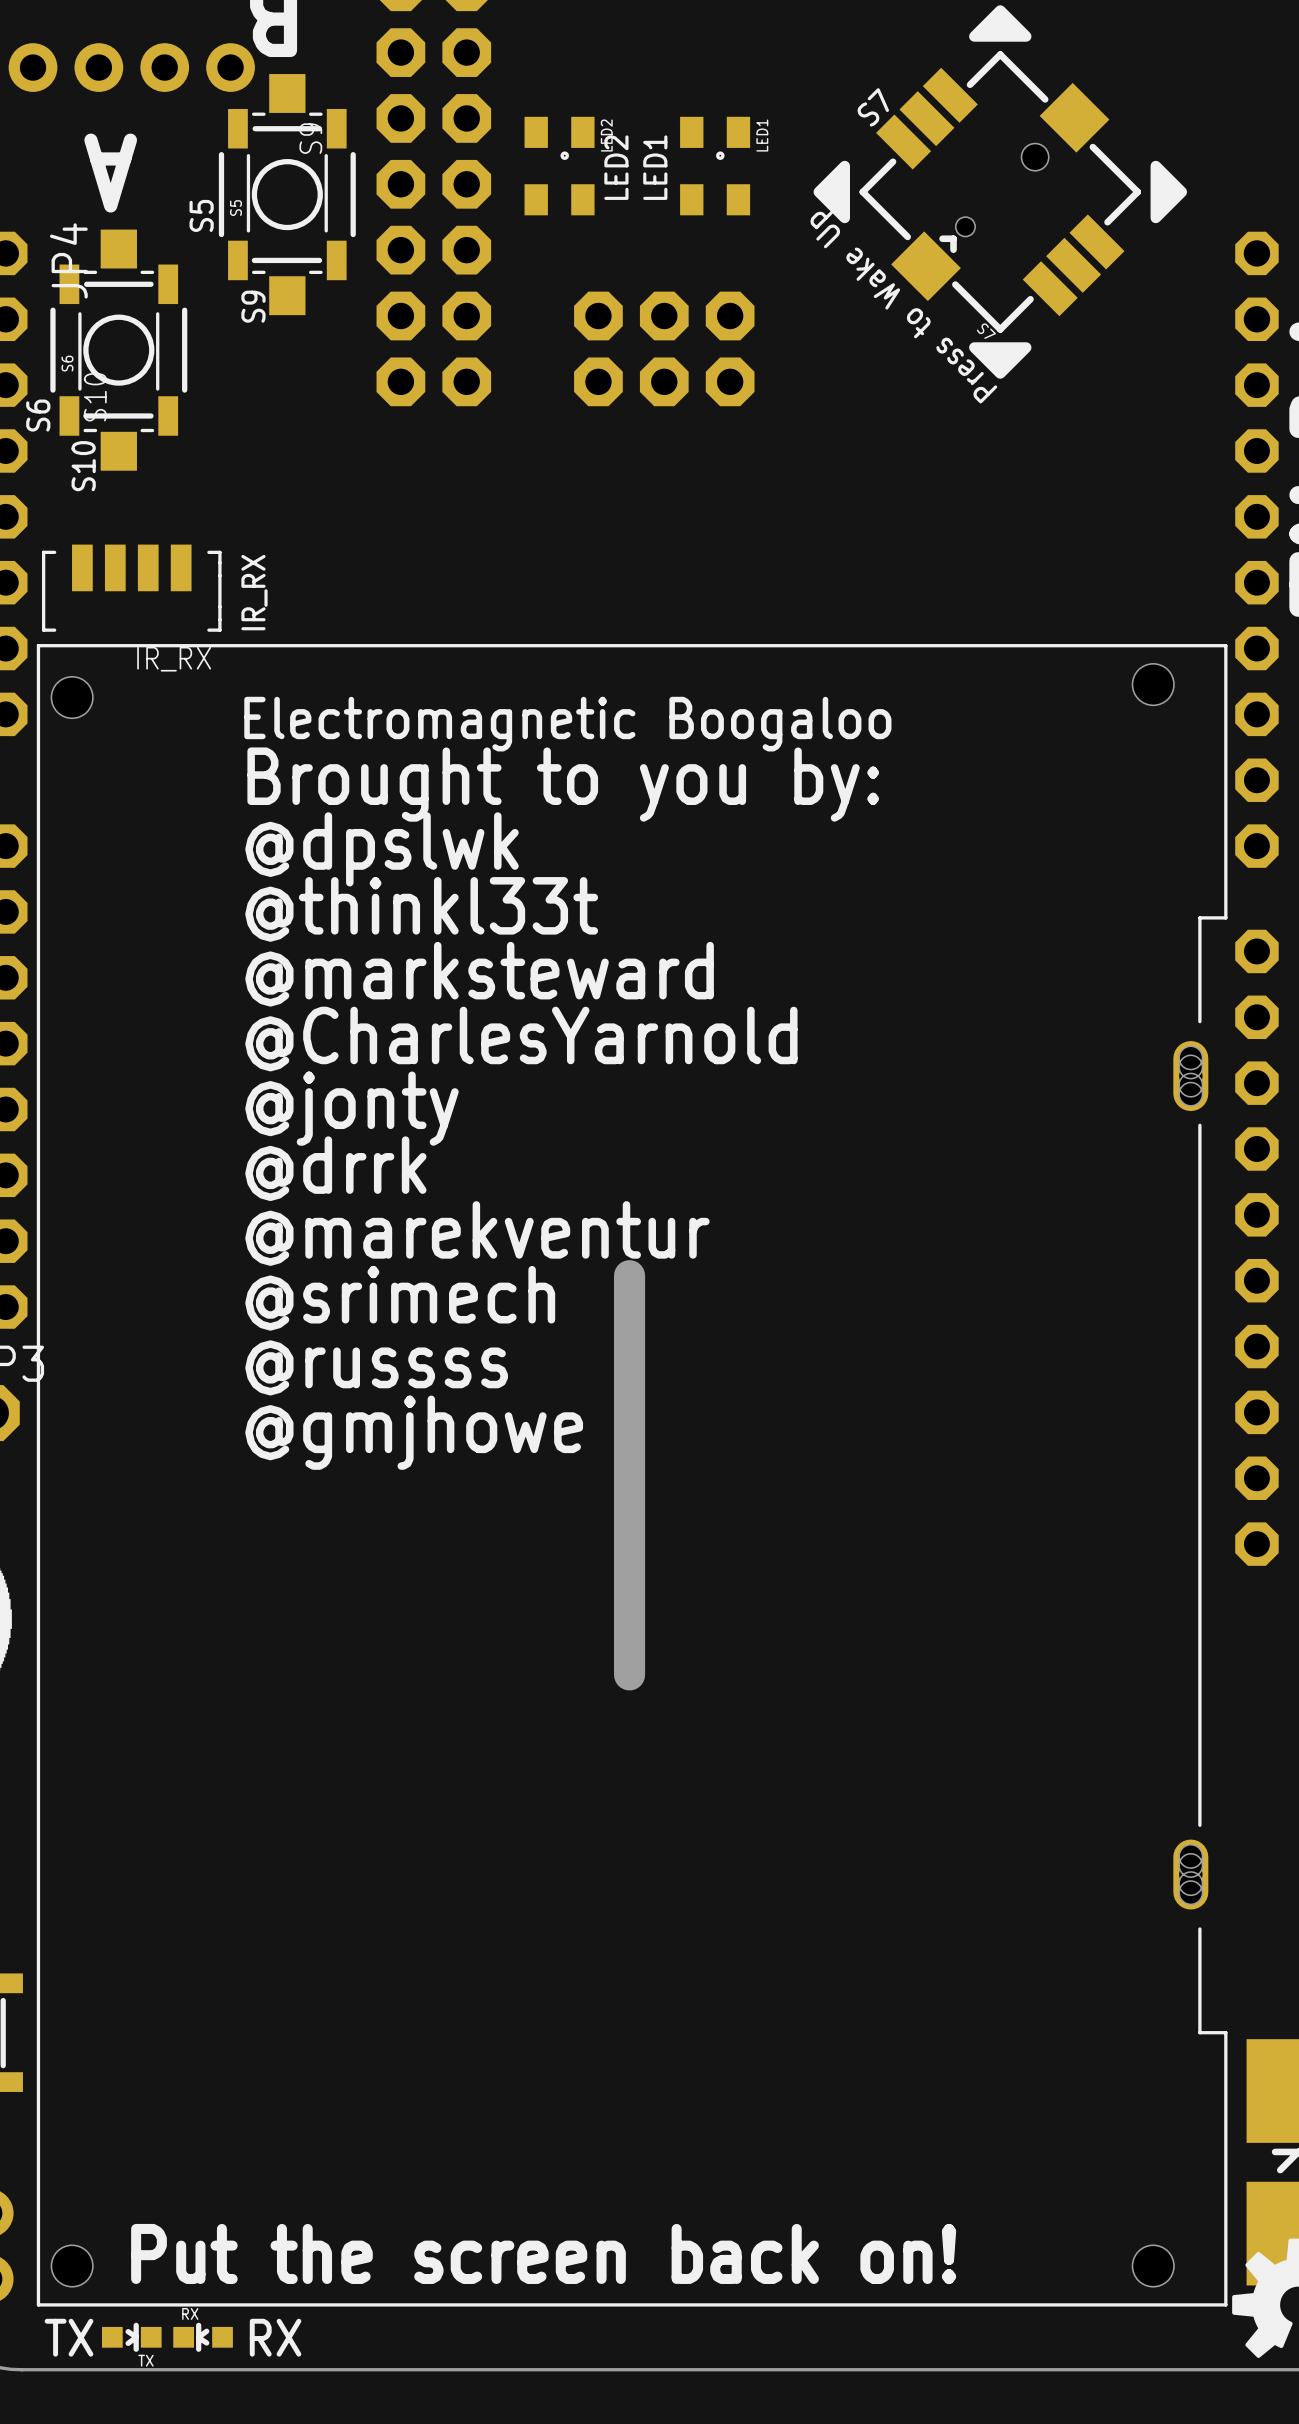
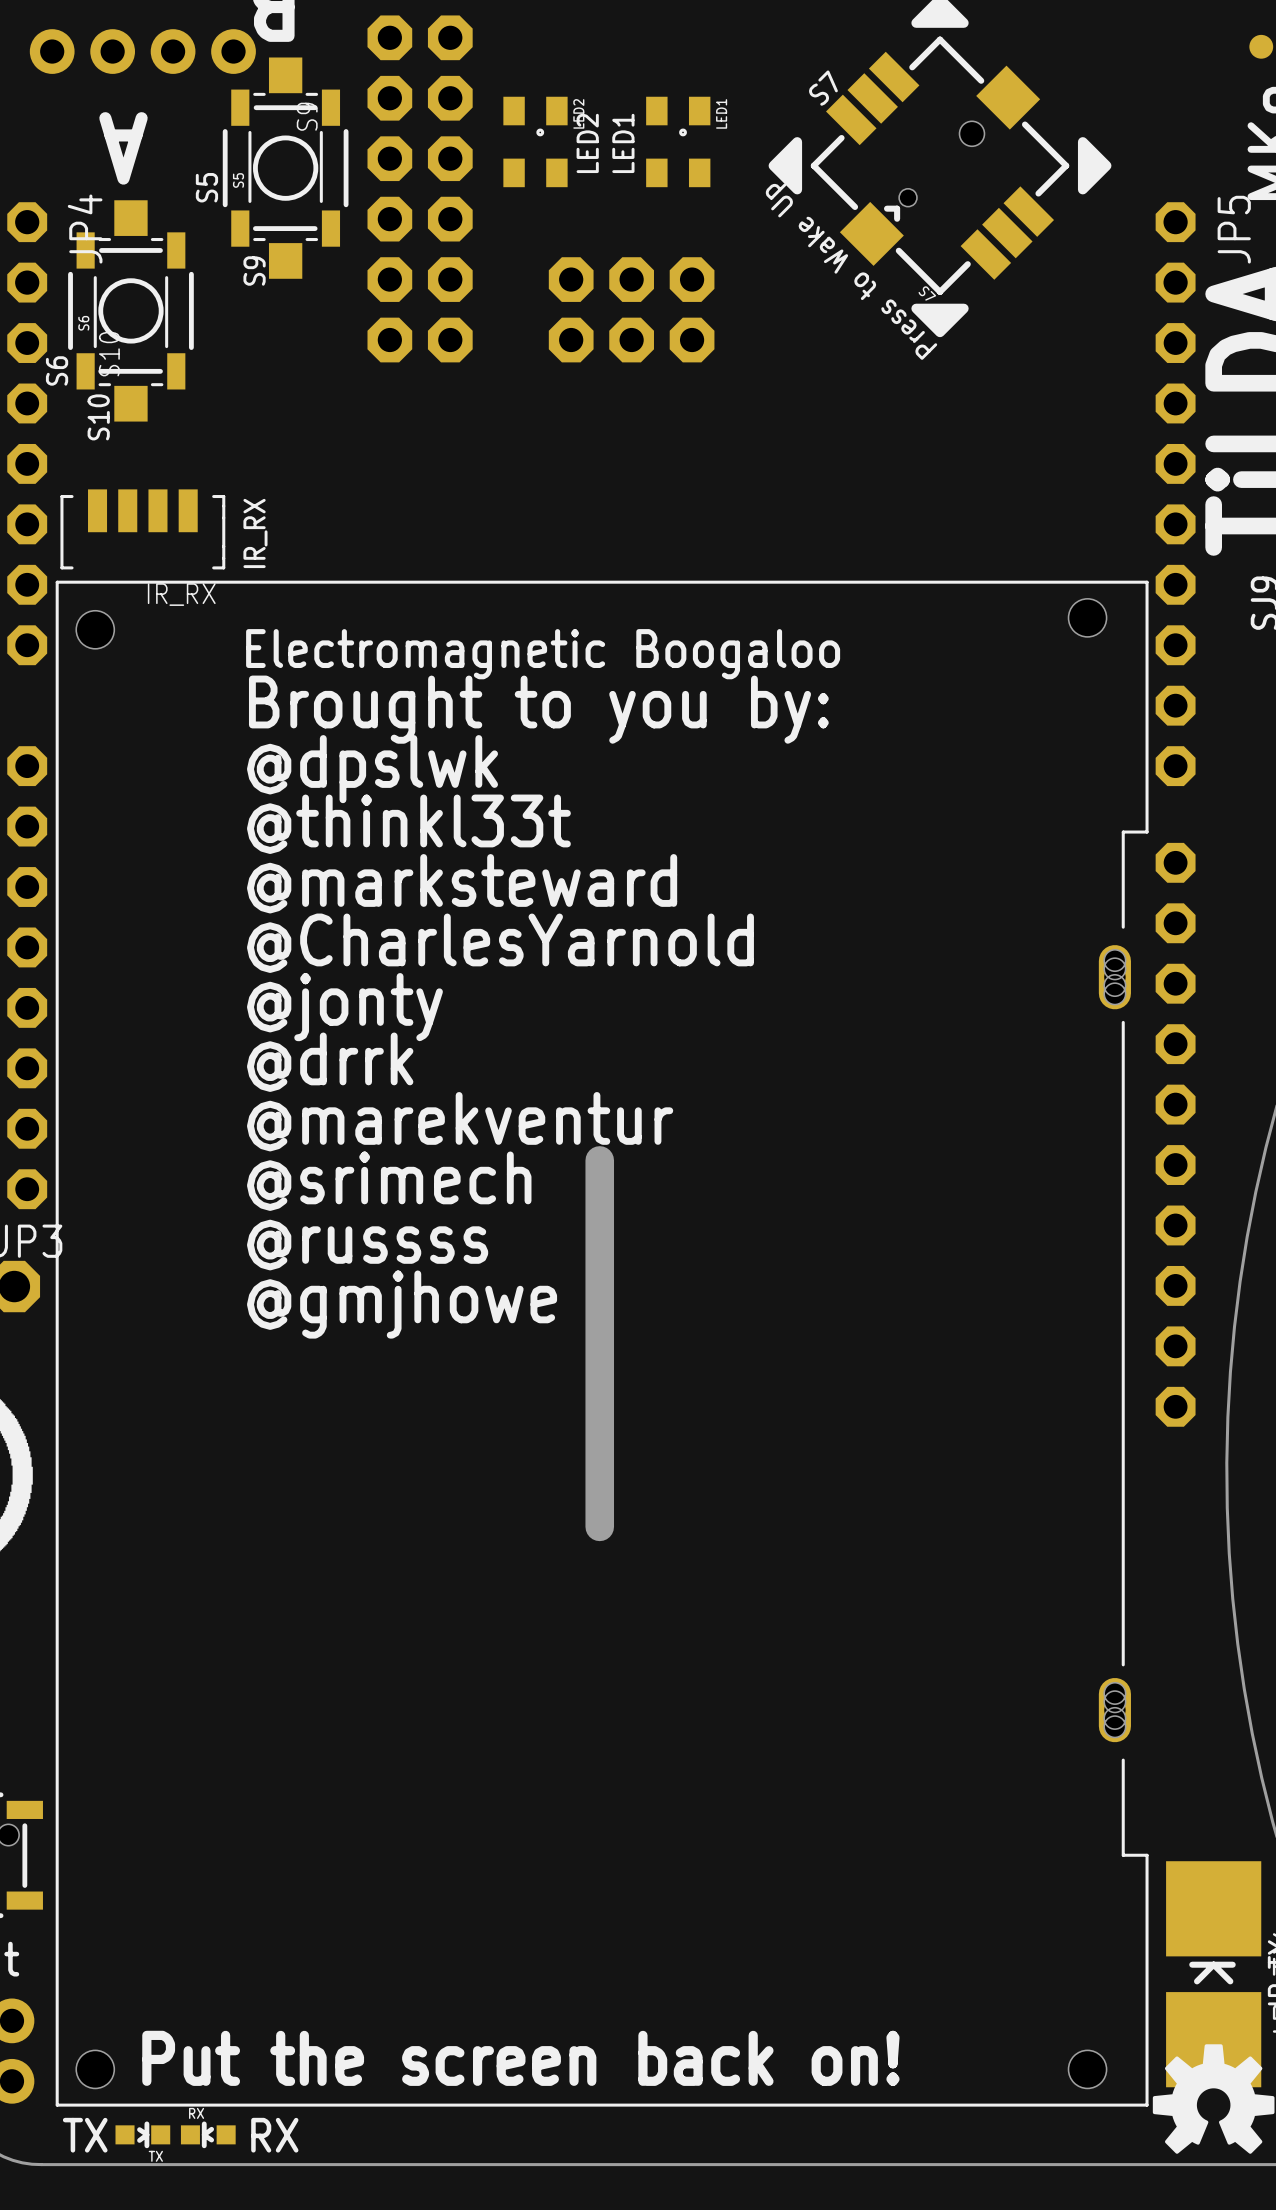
part footprint: [36, 644, 1228, 2307] -> [55, 580, 1149, 2107]

